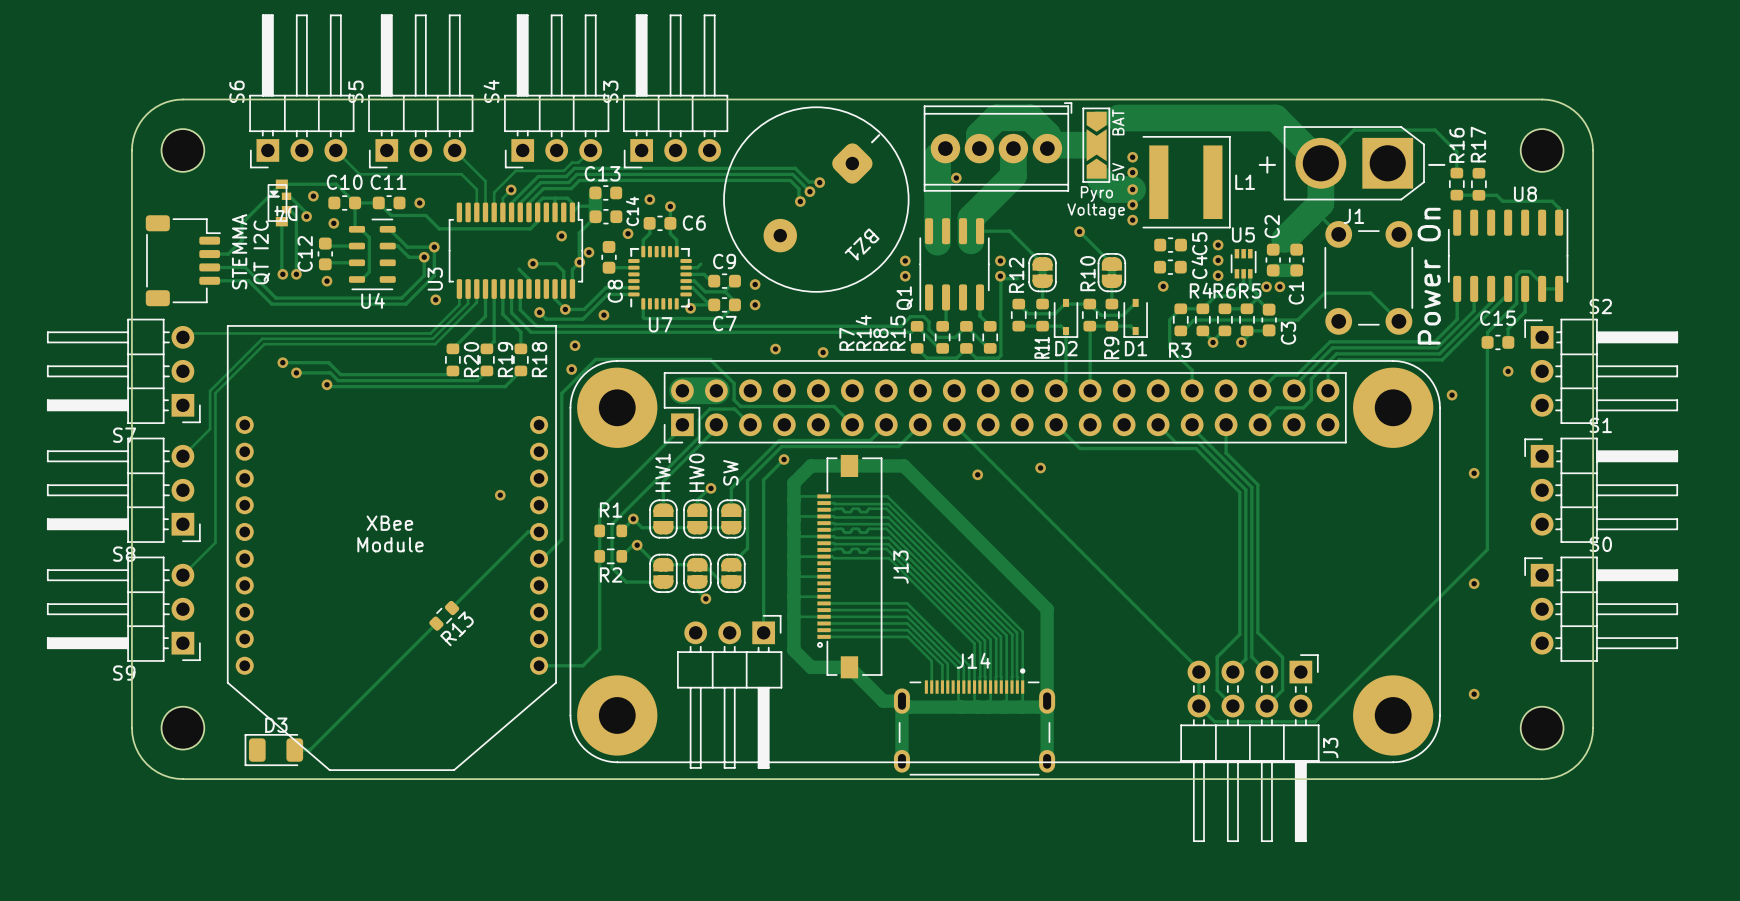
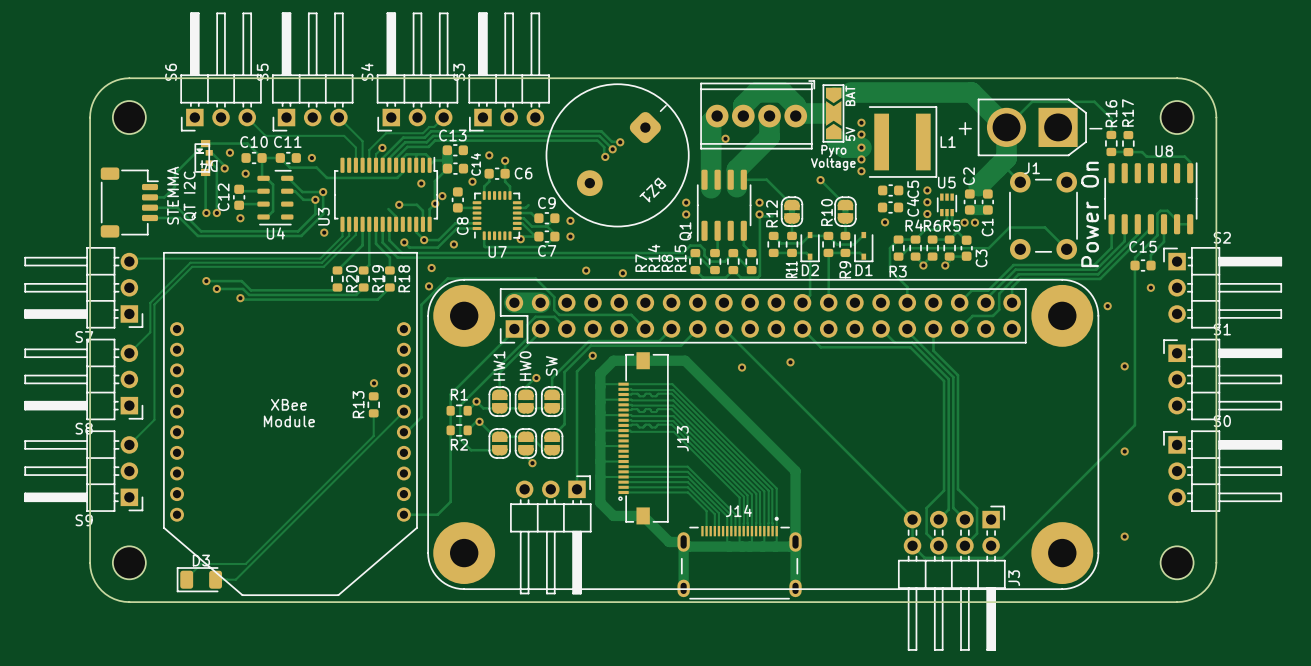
track: (539, 531) (528, 531) (452, 608) -> none
track: none -> (373, 413) (373, 435) (245, 563) (201, 563) (186, 578)
R13 rotation: 0° (444, 615) -> 45° counterclockwise (373, 404)
R13 position: (444, 615) -> (373, 404)
track: (436, 623) (310, 750) -> (403, 411) (235, 579) (227, 579)
R13 name position: R13 (456, 628) -> R13 (358, 404)

